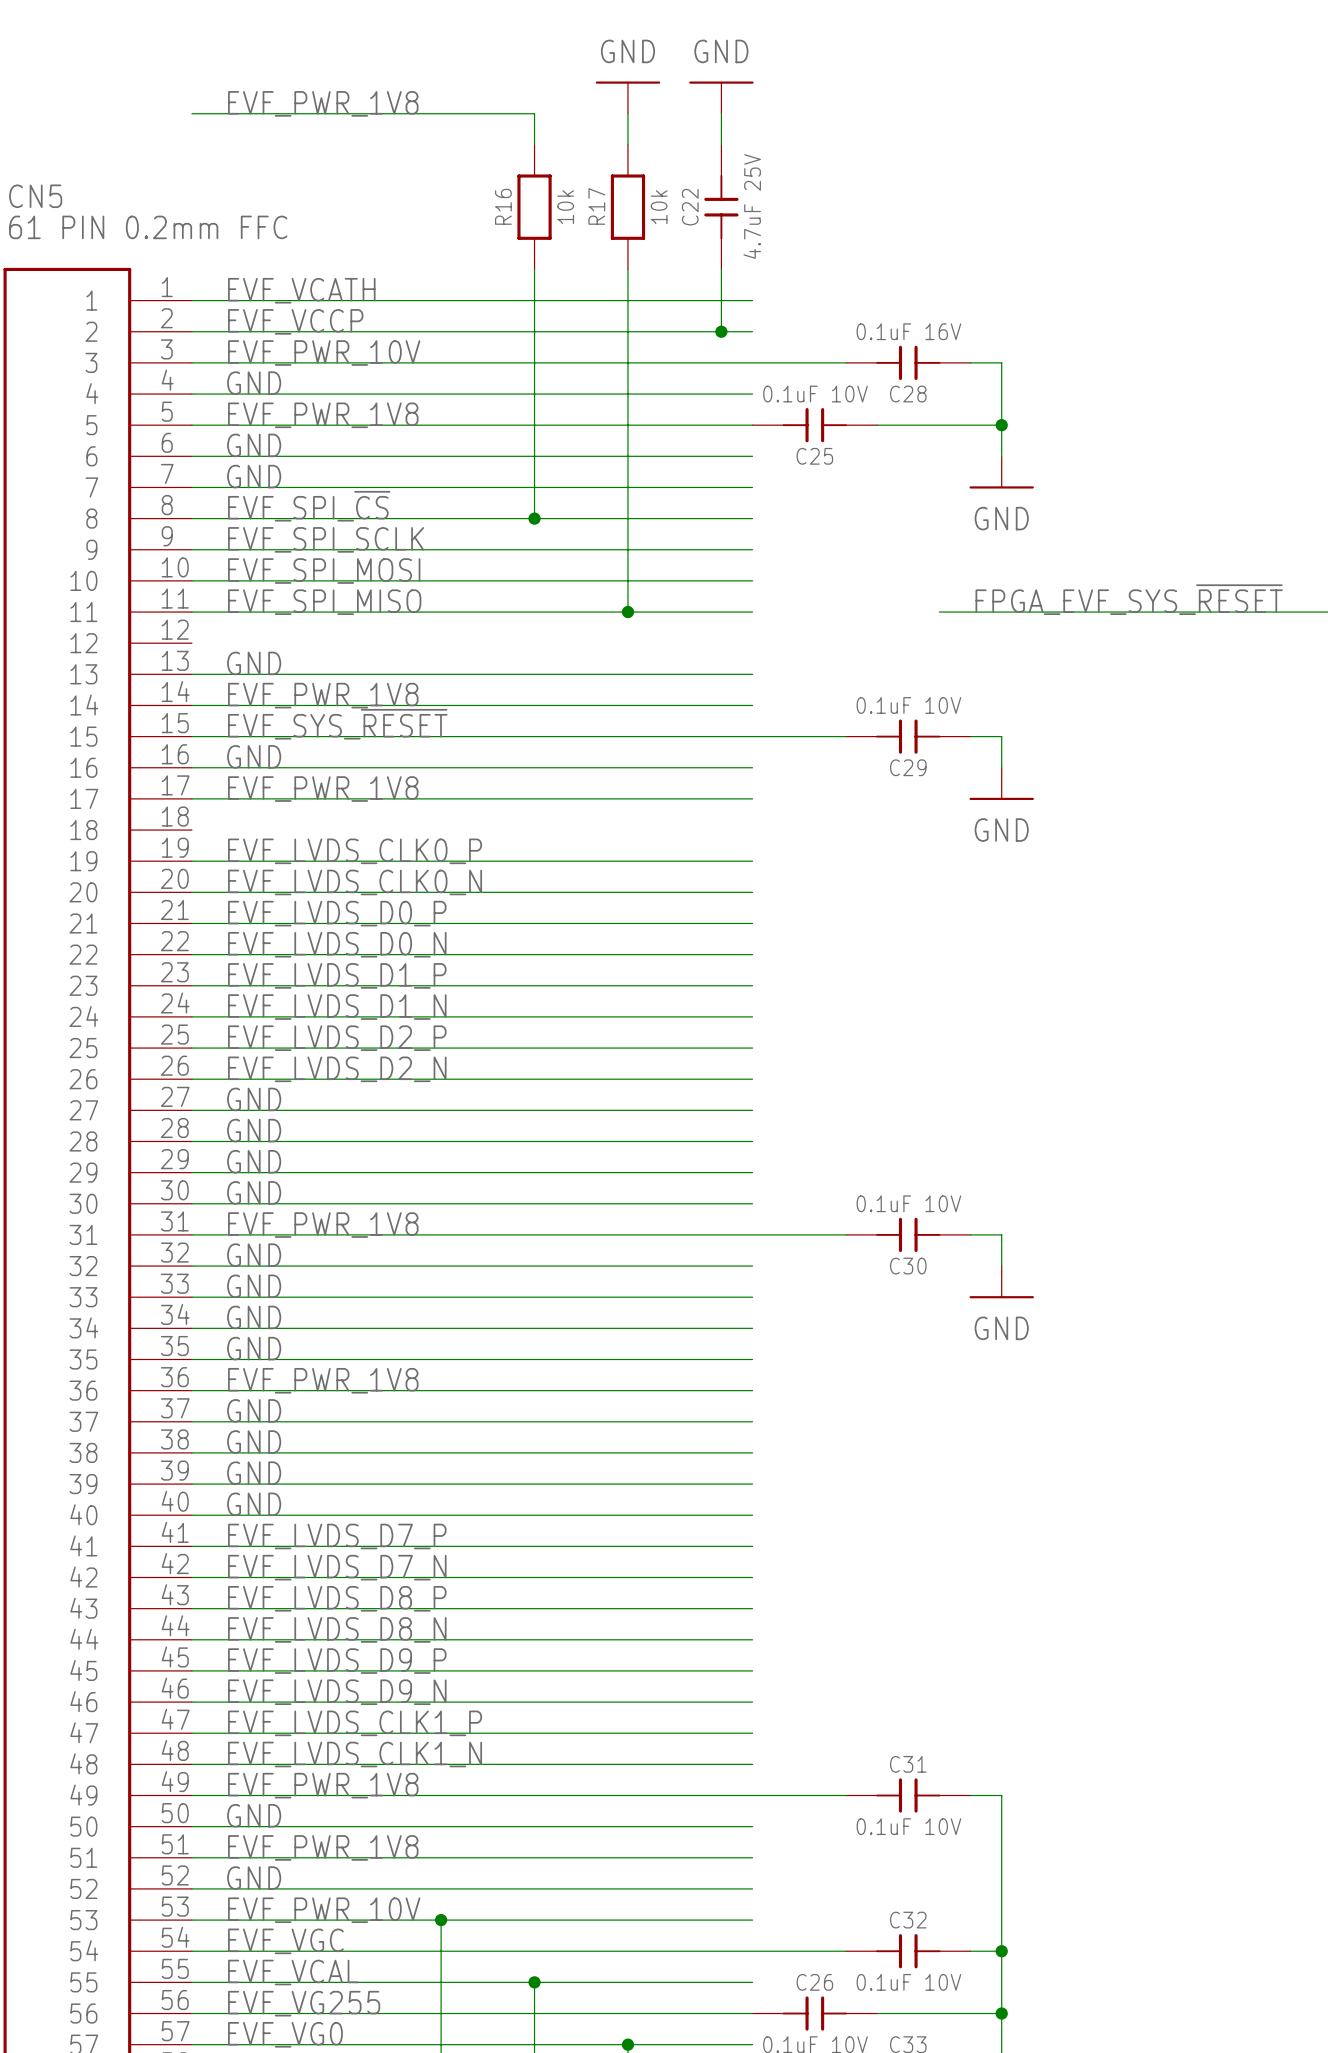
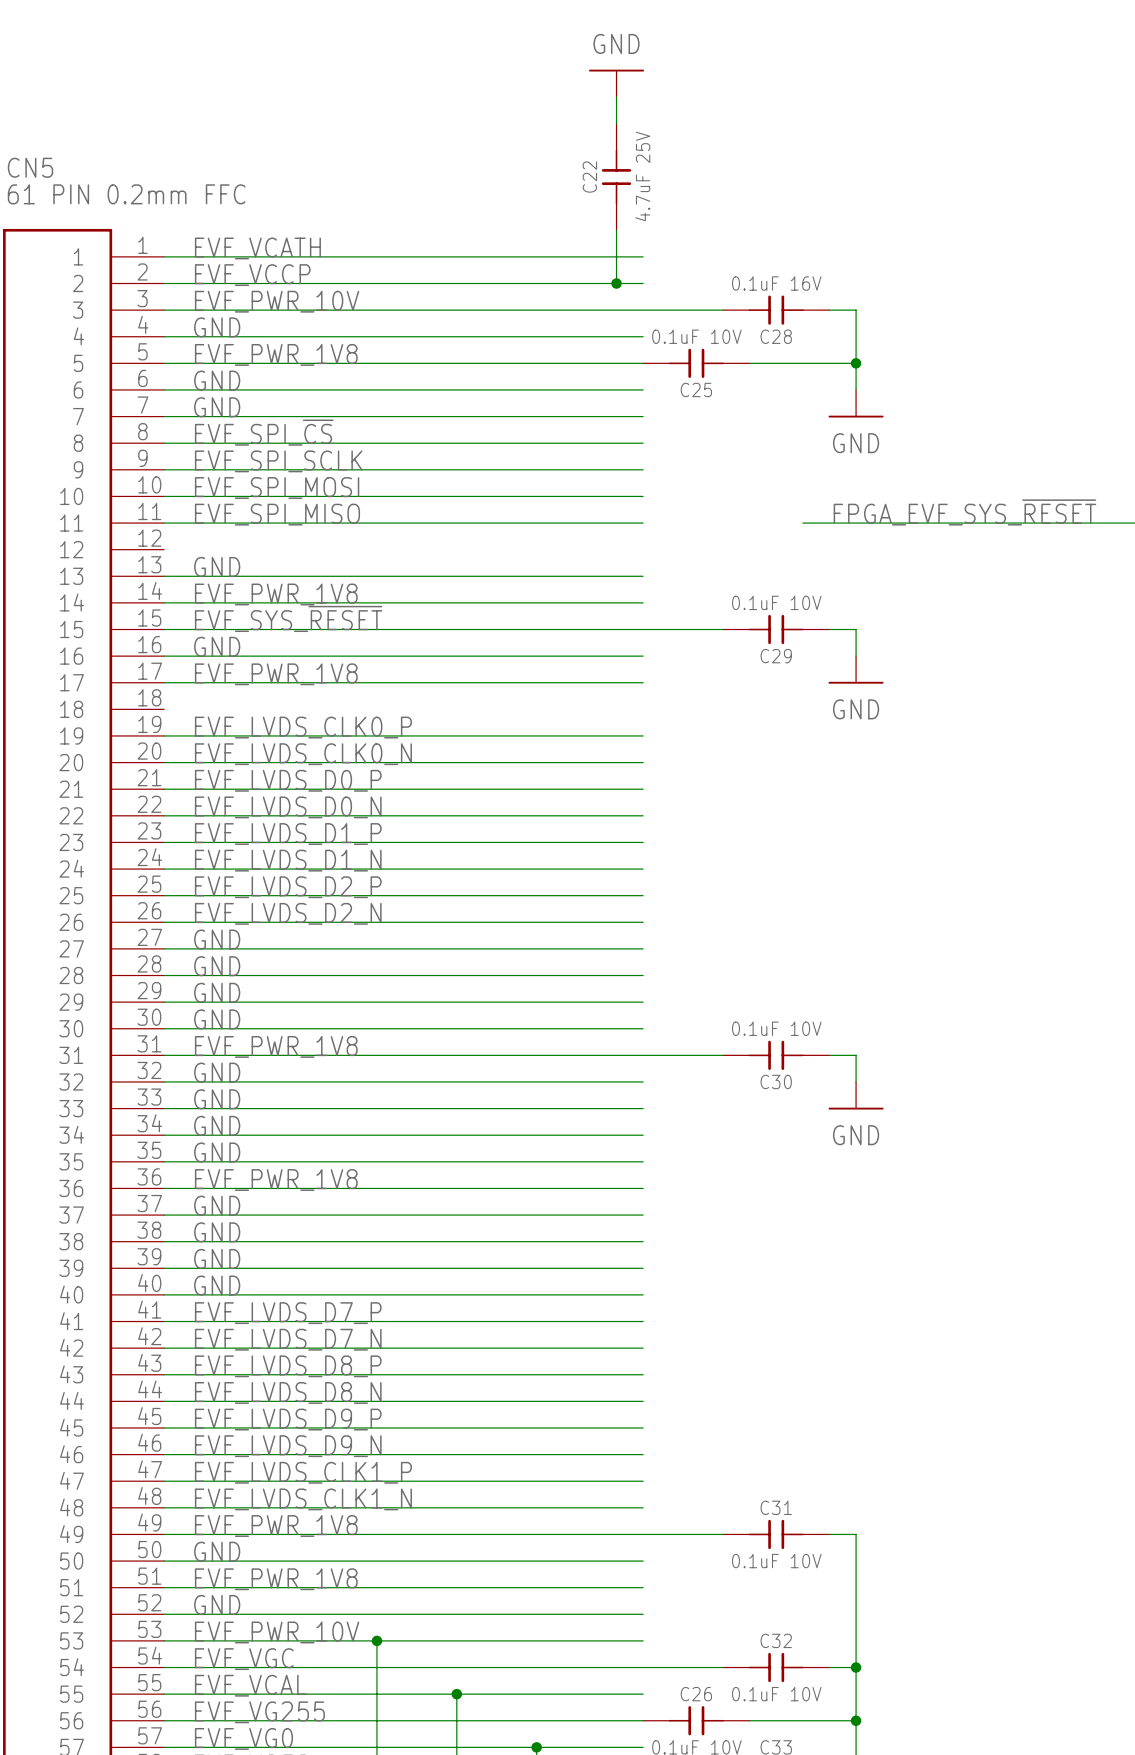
power symbol: GND (627, 97) -> none
label: EVF_PWR_1V8 (323, 103) -> none
wire: (191, 113) (534, 113) (534, 144) -> none
wire: (627, 113) (627, 144) -> none
R16: 10k (534, 207) -> none
R17: 10k (627, 207) -> none
wire: (534, 269) (534, 518) -> none
wire: (627, 269) (627, 612) -> none
junction: (534, 518) -> none
junction: (627, 612) -> none

